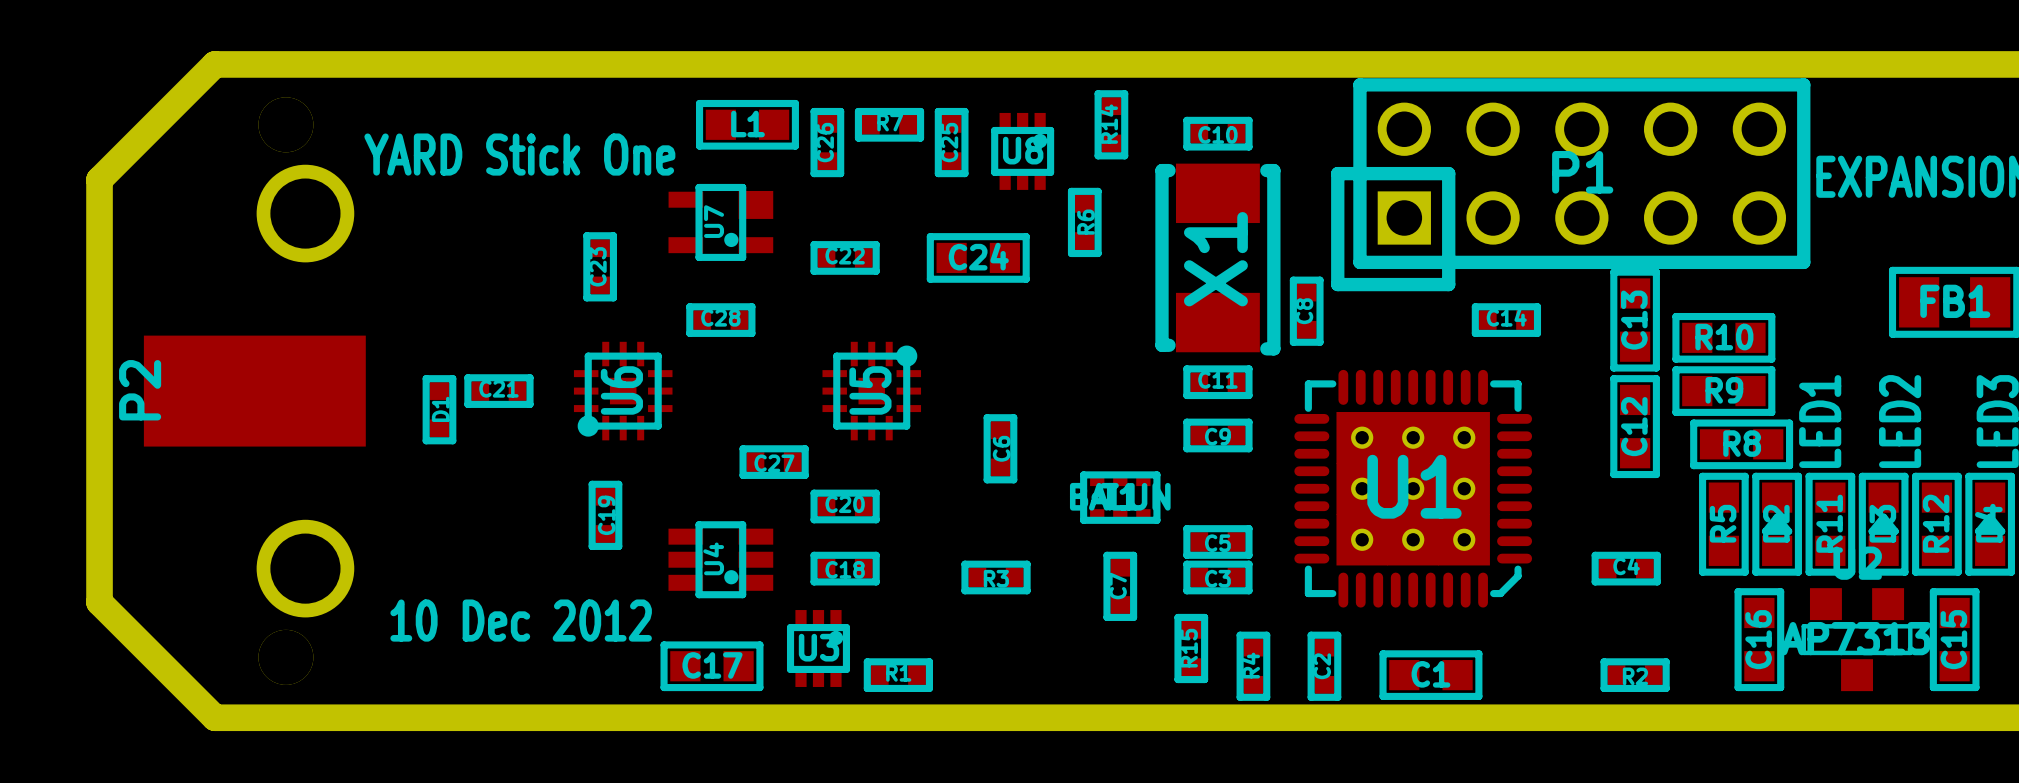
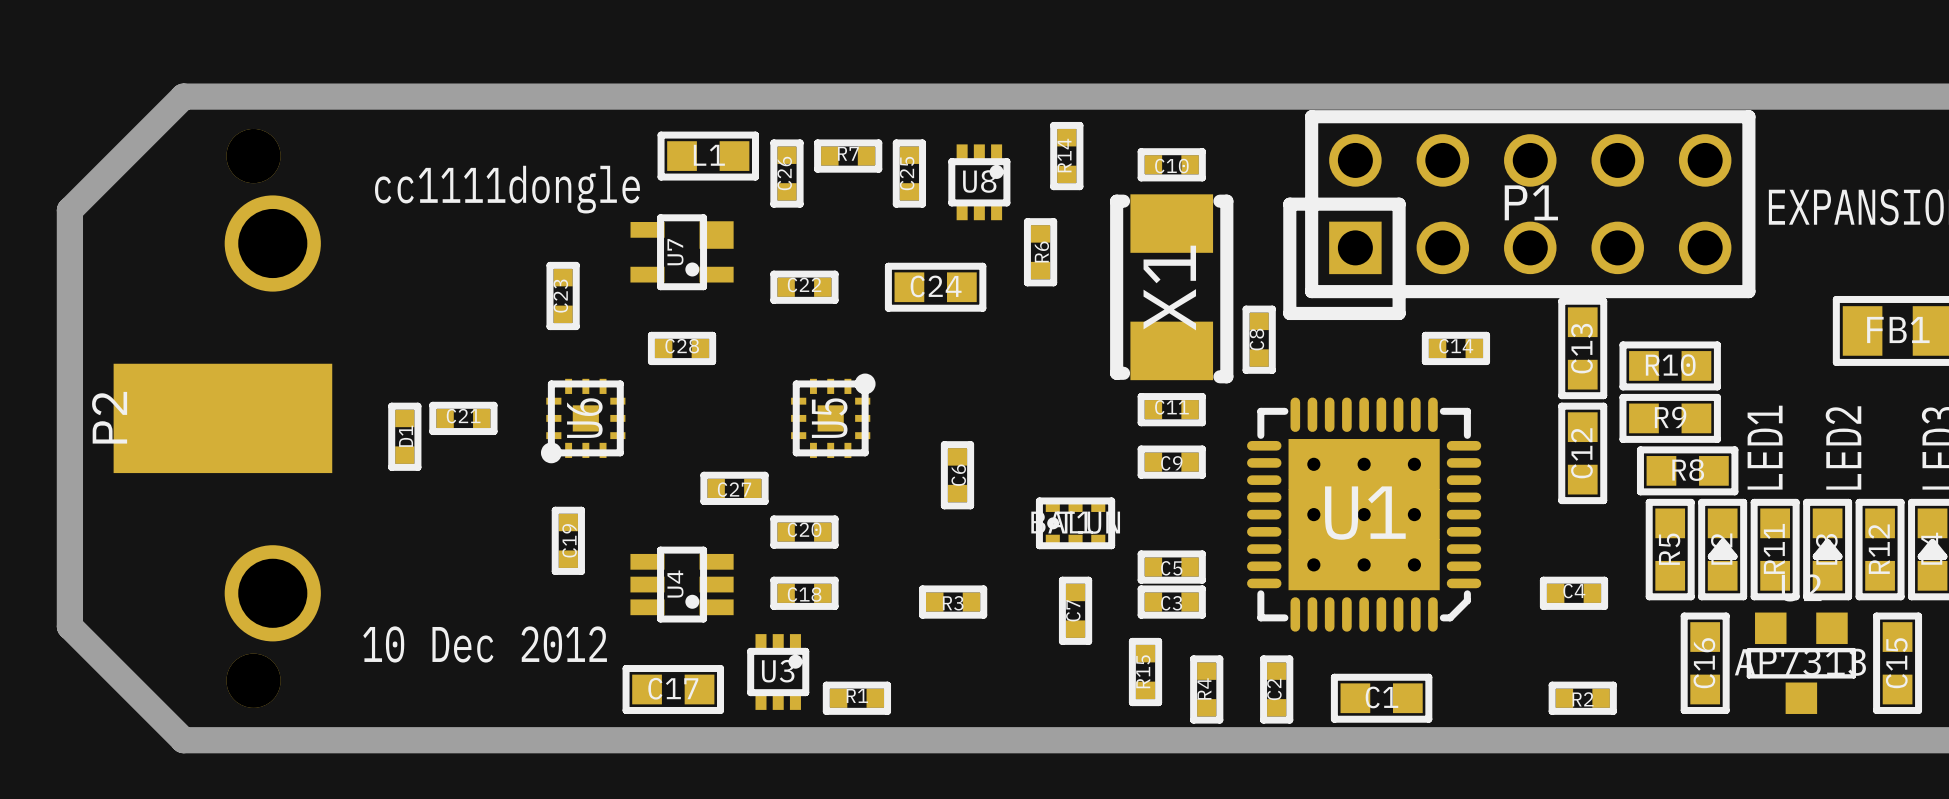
text: YARD Stick One (519, 154) -> cc1111dongle (507, 189)
U6 footprint: [573, 341, 673, 441] -> [540, 378, 626, 464]
U5 footprint: [822, 341, 922, 441] -> [791, 373, 876, 458]

